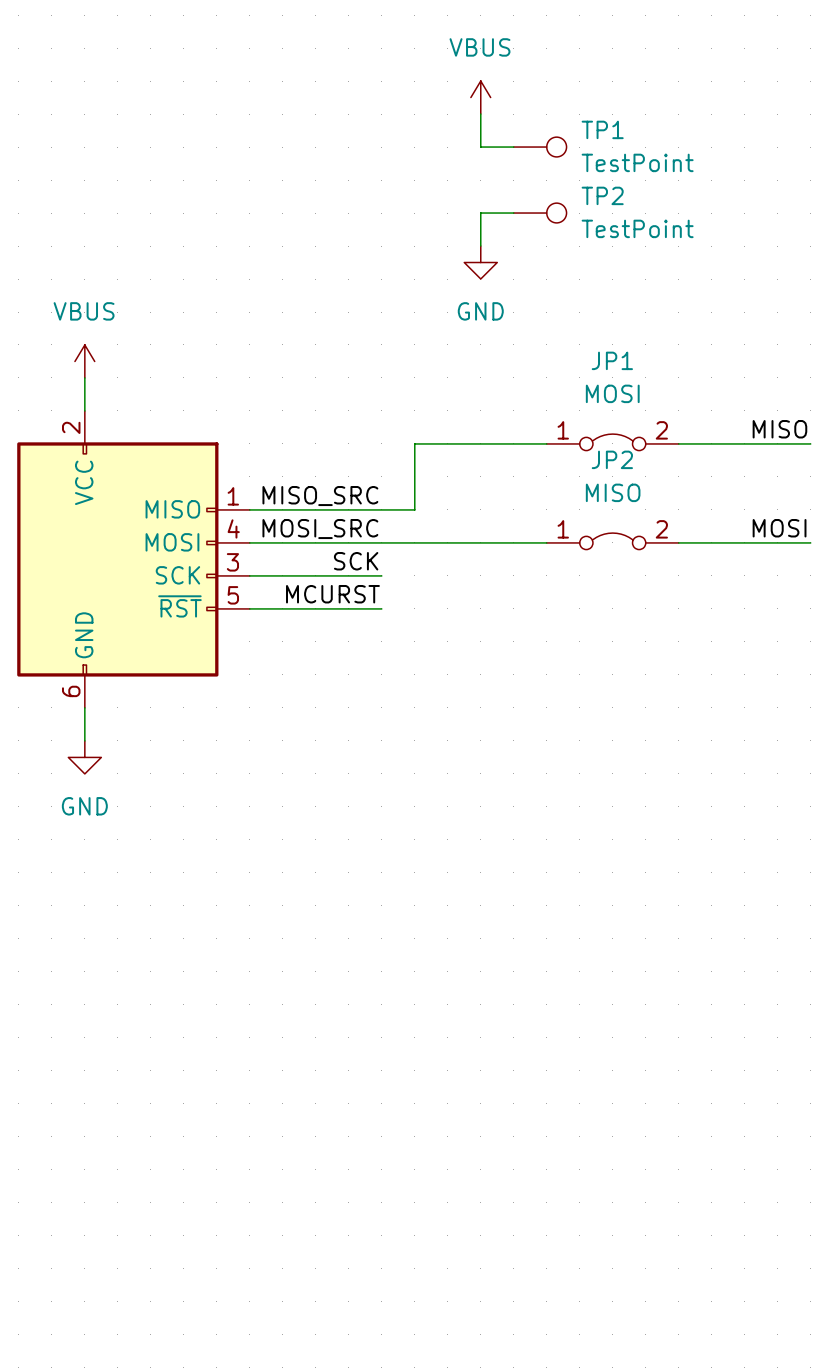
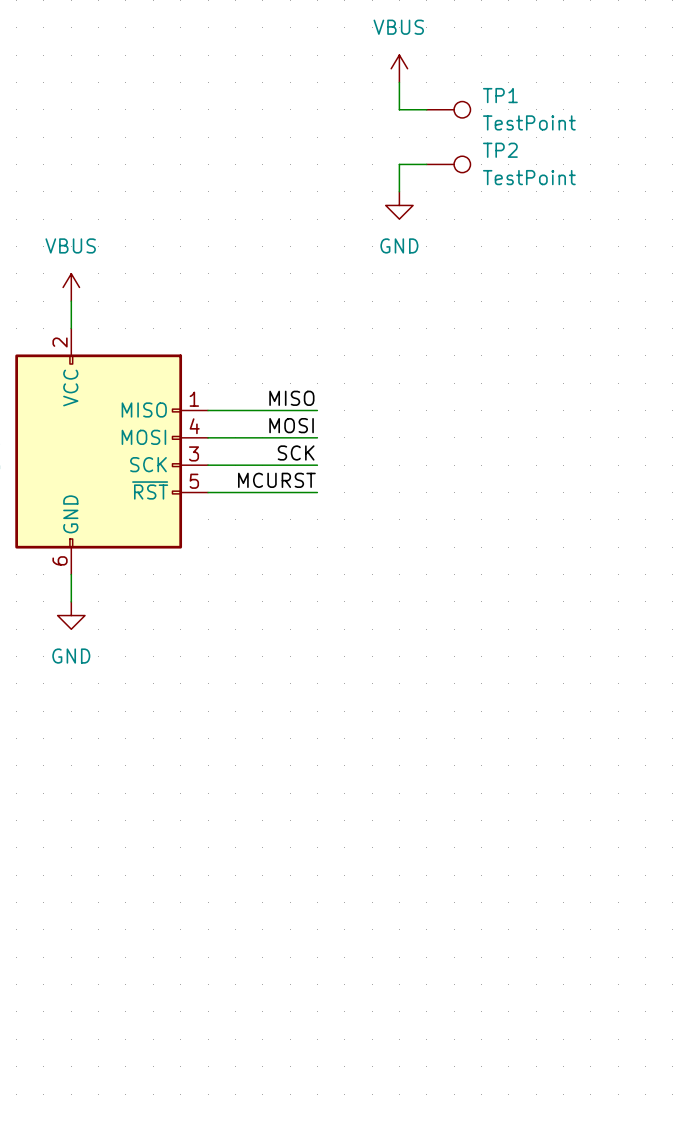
label: MISO (779, 429) -> none
JP1: MOSI (612, 442) -> none
wire: (546, 443) (414, 443) (414, 509) (381, 509) -> none
wire: (678, 443) (810, 443) -> none
label: MISO_SRC (320, 496) -> MISO (291, 398)
label: MOSI (779, 528) -> none
label: MOSI_SRC (320, 529) -> MOSI (291, 425)
JP2: MISO (612, 541) -> none
wire: (381, 542) (546, 542) -> none
wire: (678, 542) (810, 542) -> none

